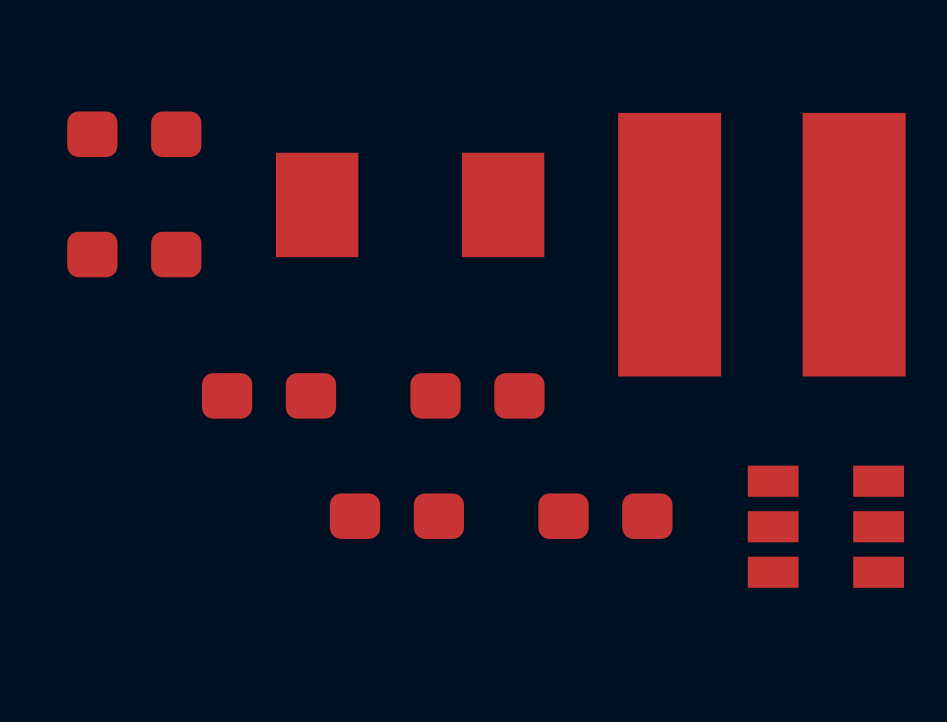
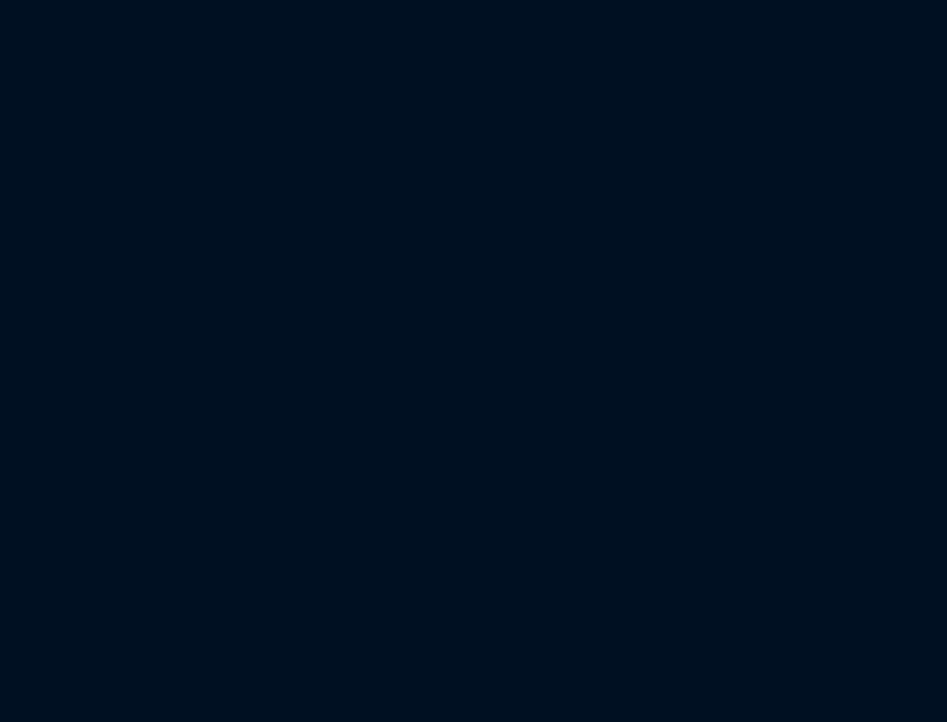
part: (134, 134) -> none
part: (410, 204) -> none
part: (761, 244) -> none
part: (134, 254) -> none
part: (268, 395) -> none
part: (477, 395) -> none
part: (396, 516) -> none
part: (605, 516) -> none
part: (825, 526) -> none

